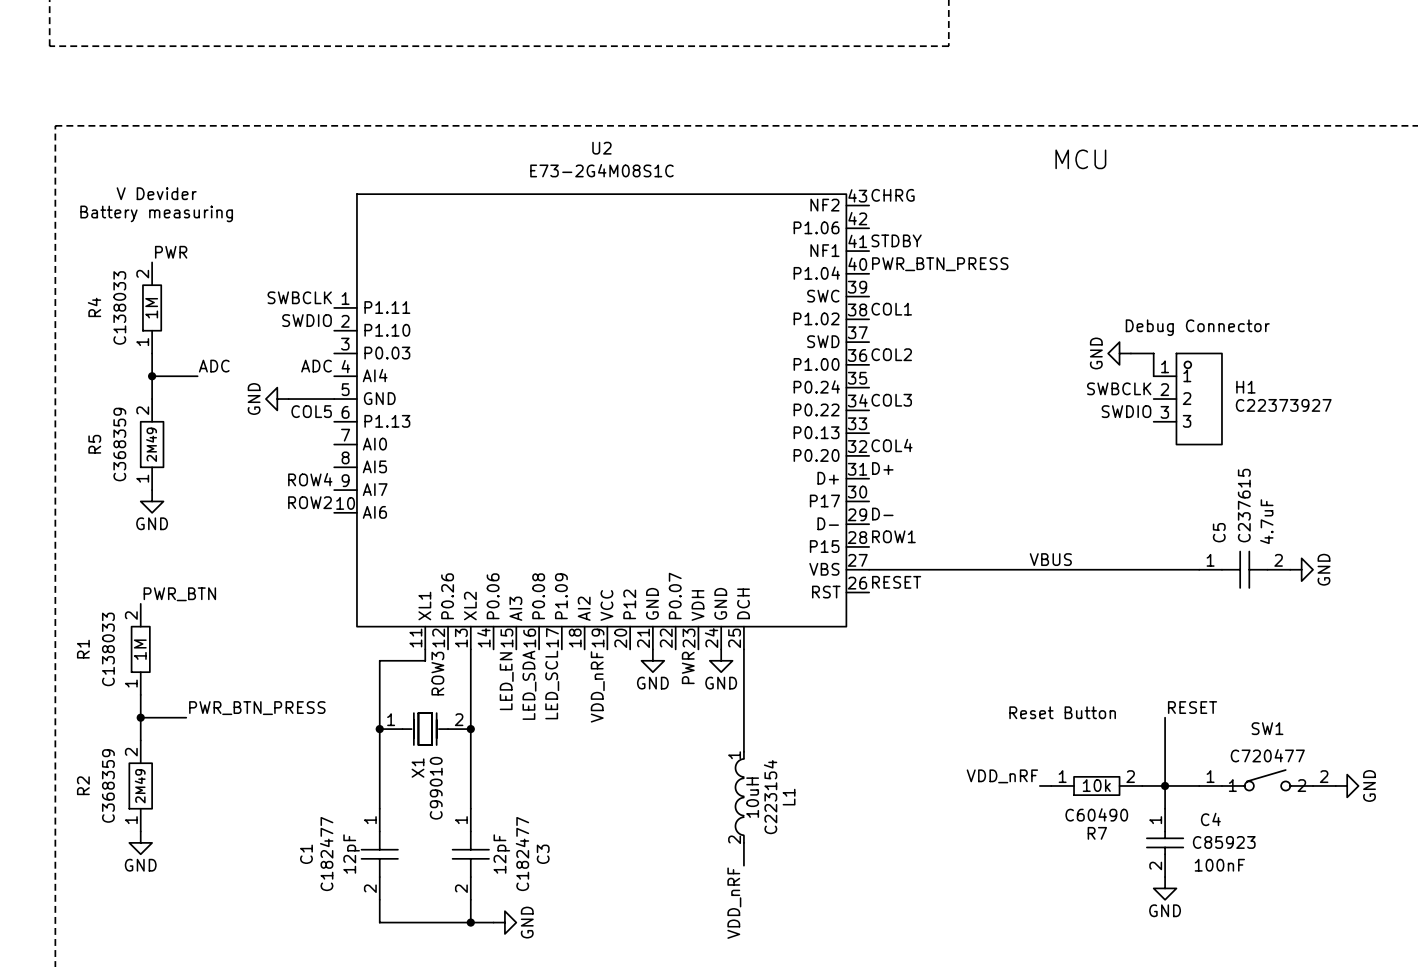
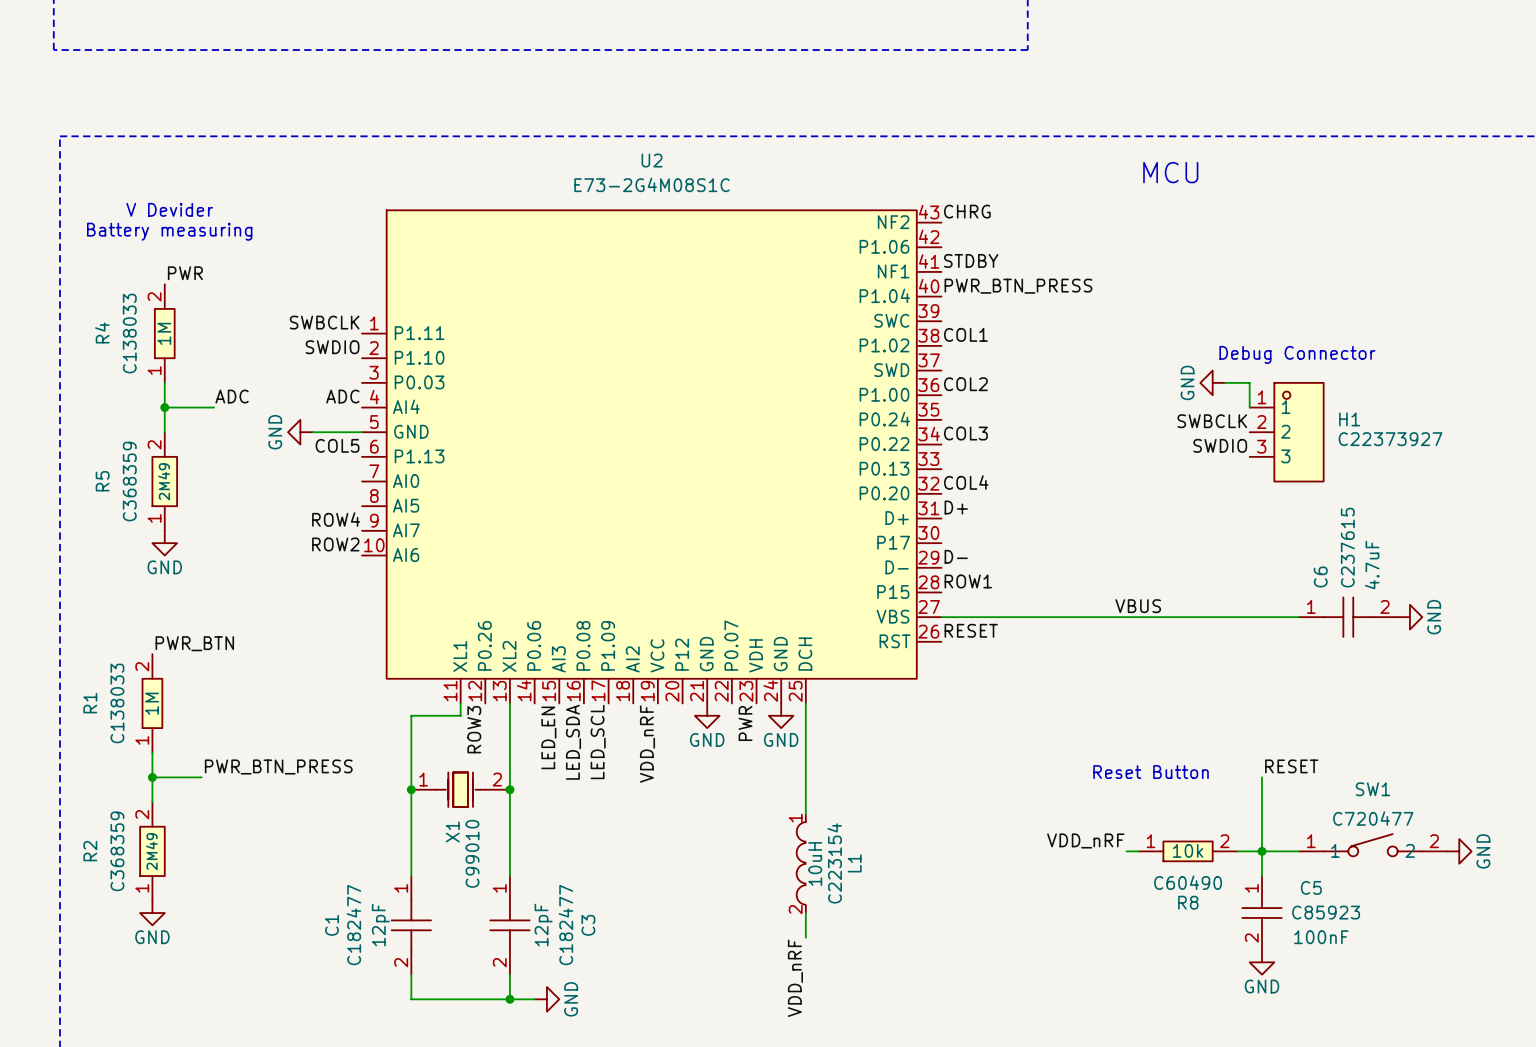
C5 name: C5 (1219, 532) -> C6 (1320, 577)
C4 name: C4 (1210, 819) -> C5 (1311, 887)
R7 name: R7 (1097, 833) -> R8 (1188, 902)

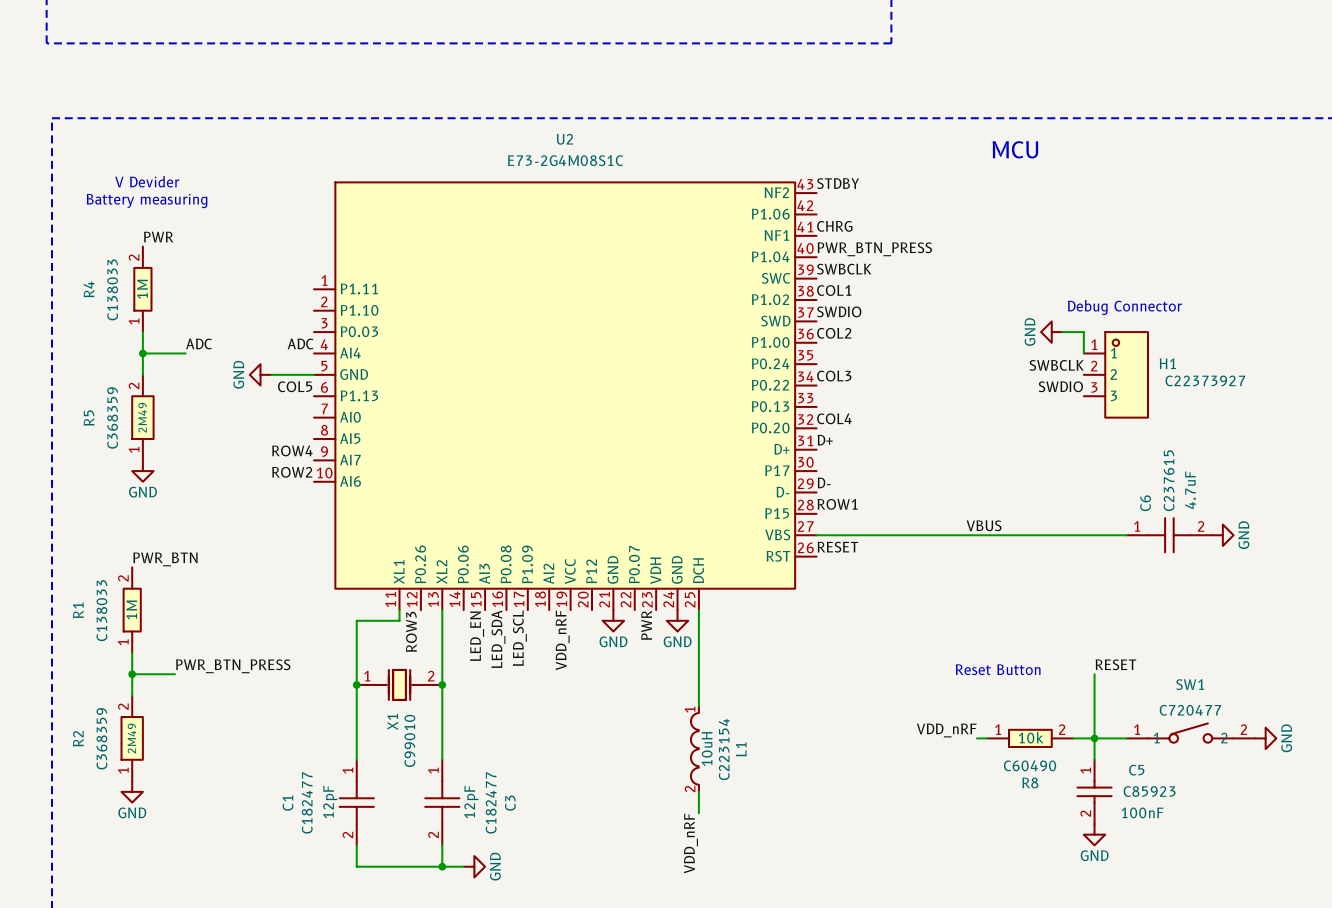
label: CHRG (967, 211) -> STDBY (838, 183)
label: STDBY (971, 260) -> CHRG (834, 226)
label: none -> SWBCLK (844, 269)
label: SWBCLK (324, 322) -> none
label: SWDIO (332, 347) -> none
label: none -> SWDIO (839, 311)

